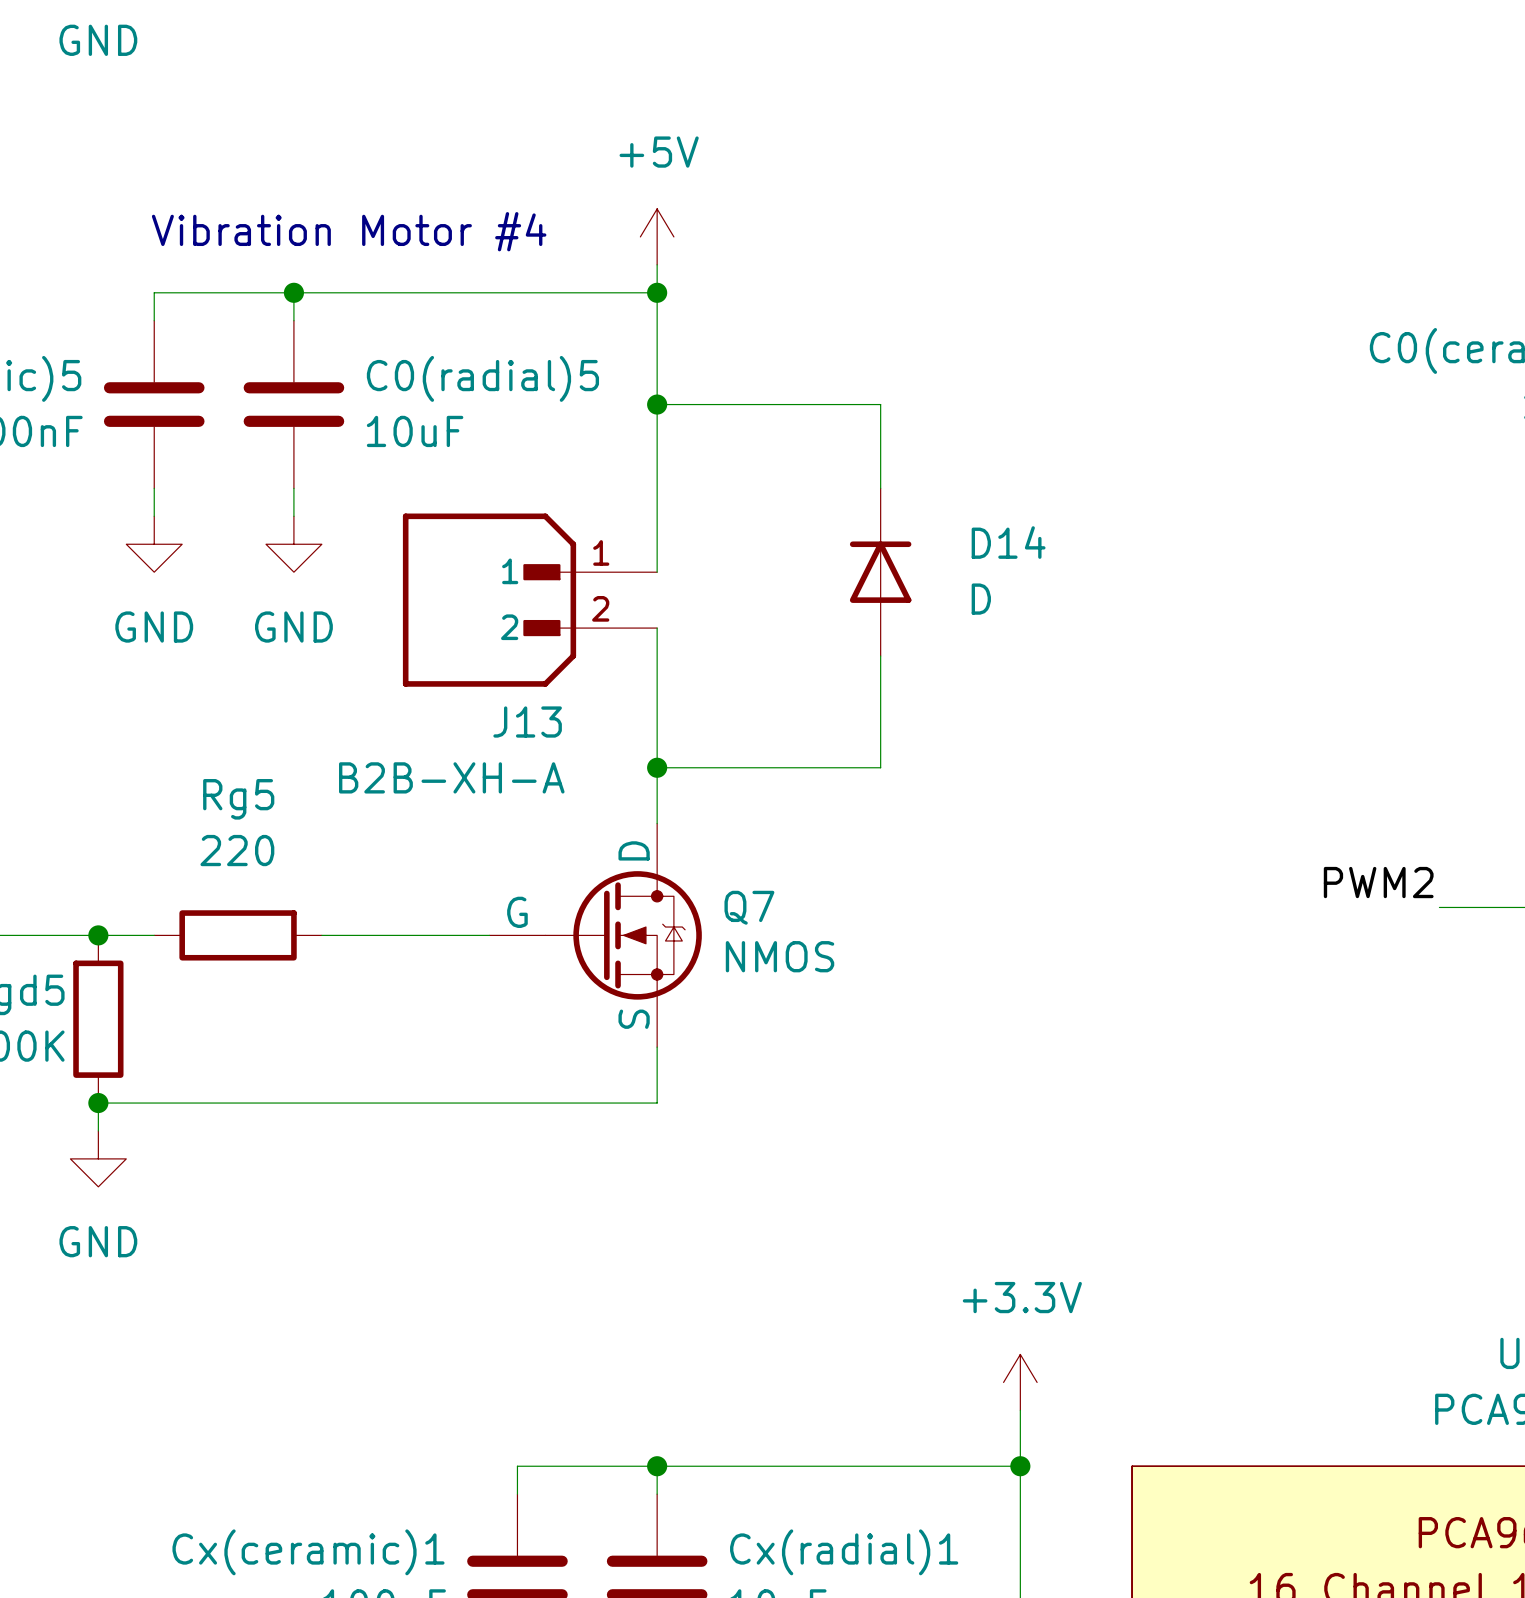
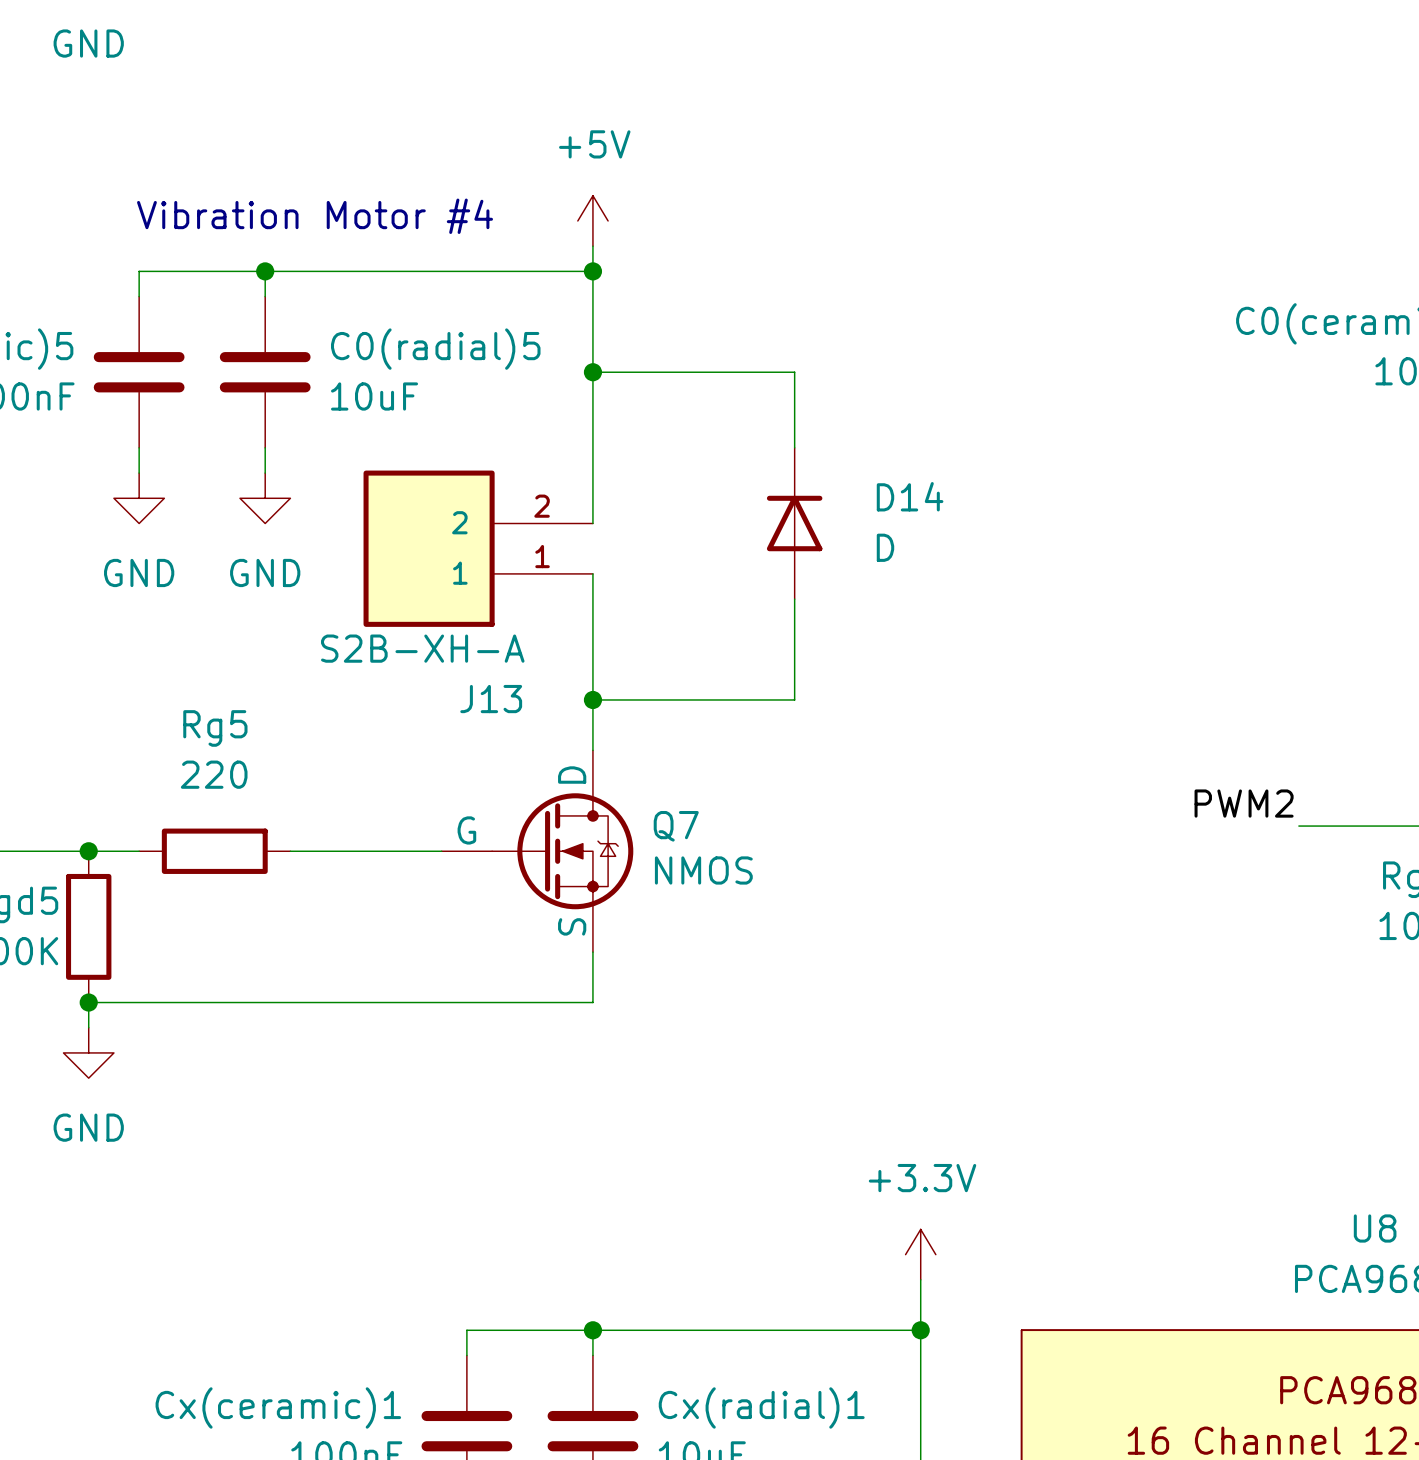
J13 symbol: [402, 513, 658, 687] -> [363, 470, 593, 627]
J13 name position: J13 (527, 722) -> J13 (491, 699)
J13 value: B2B-XH-A (451, 777) -> S2B-XH-A (422, 648)

